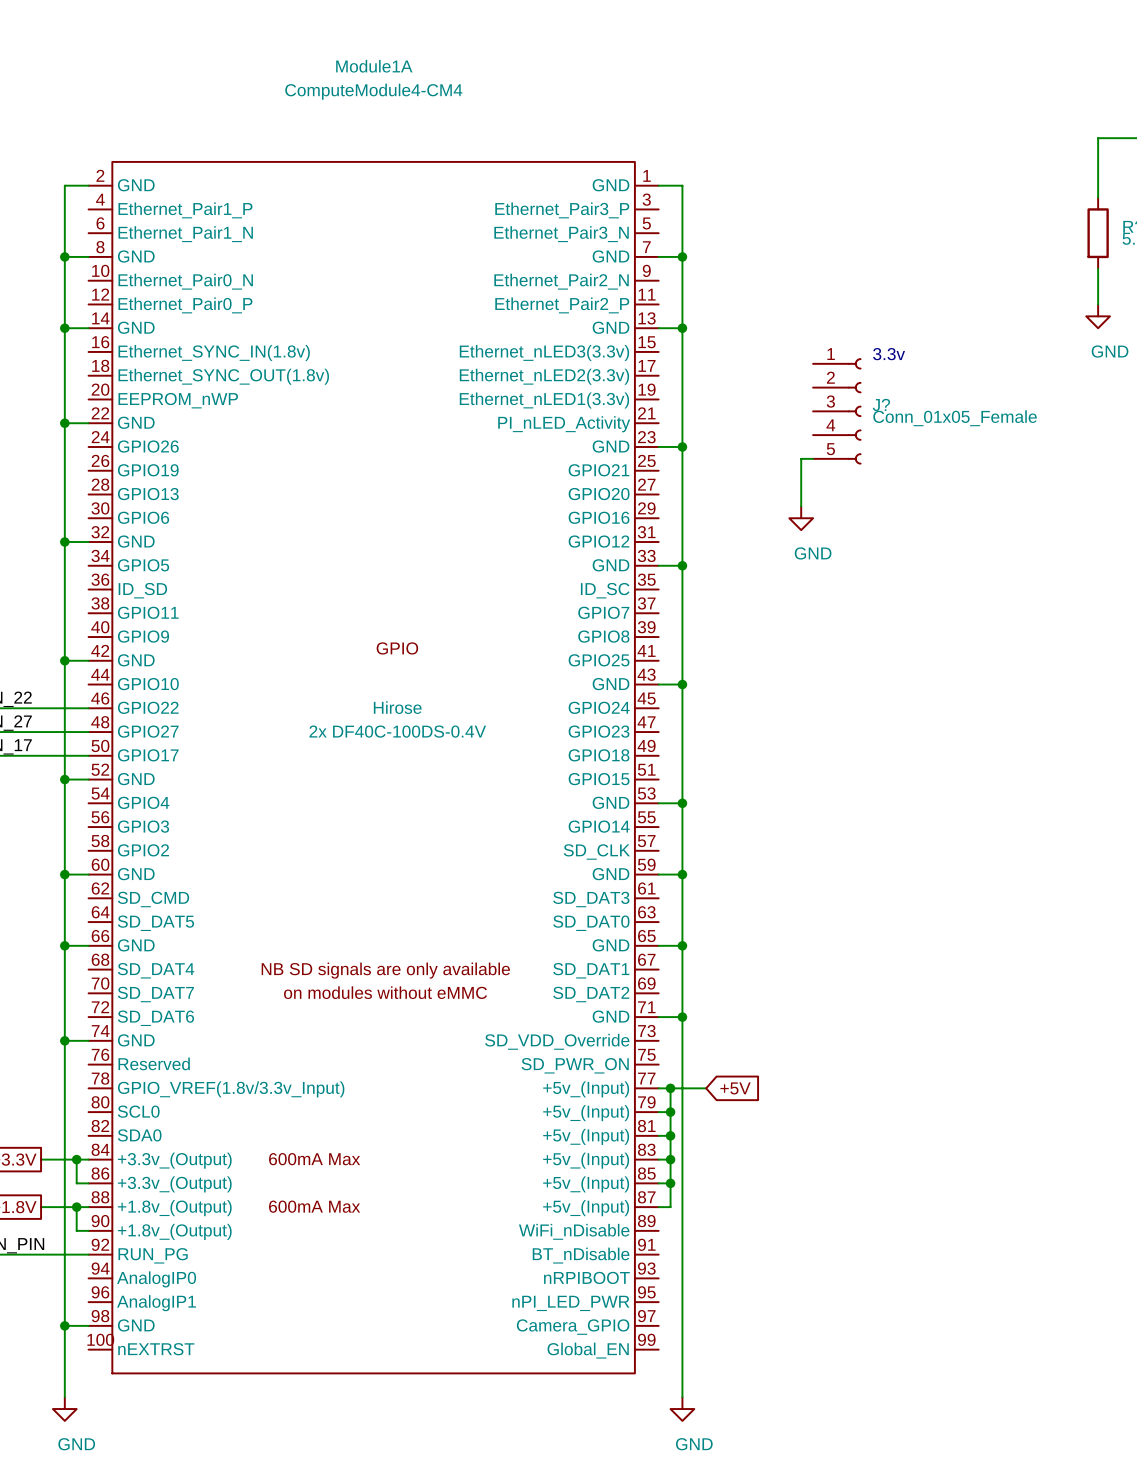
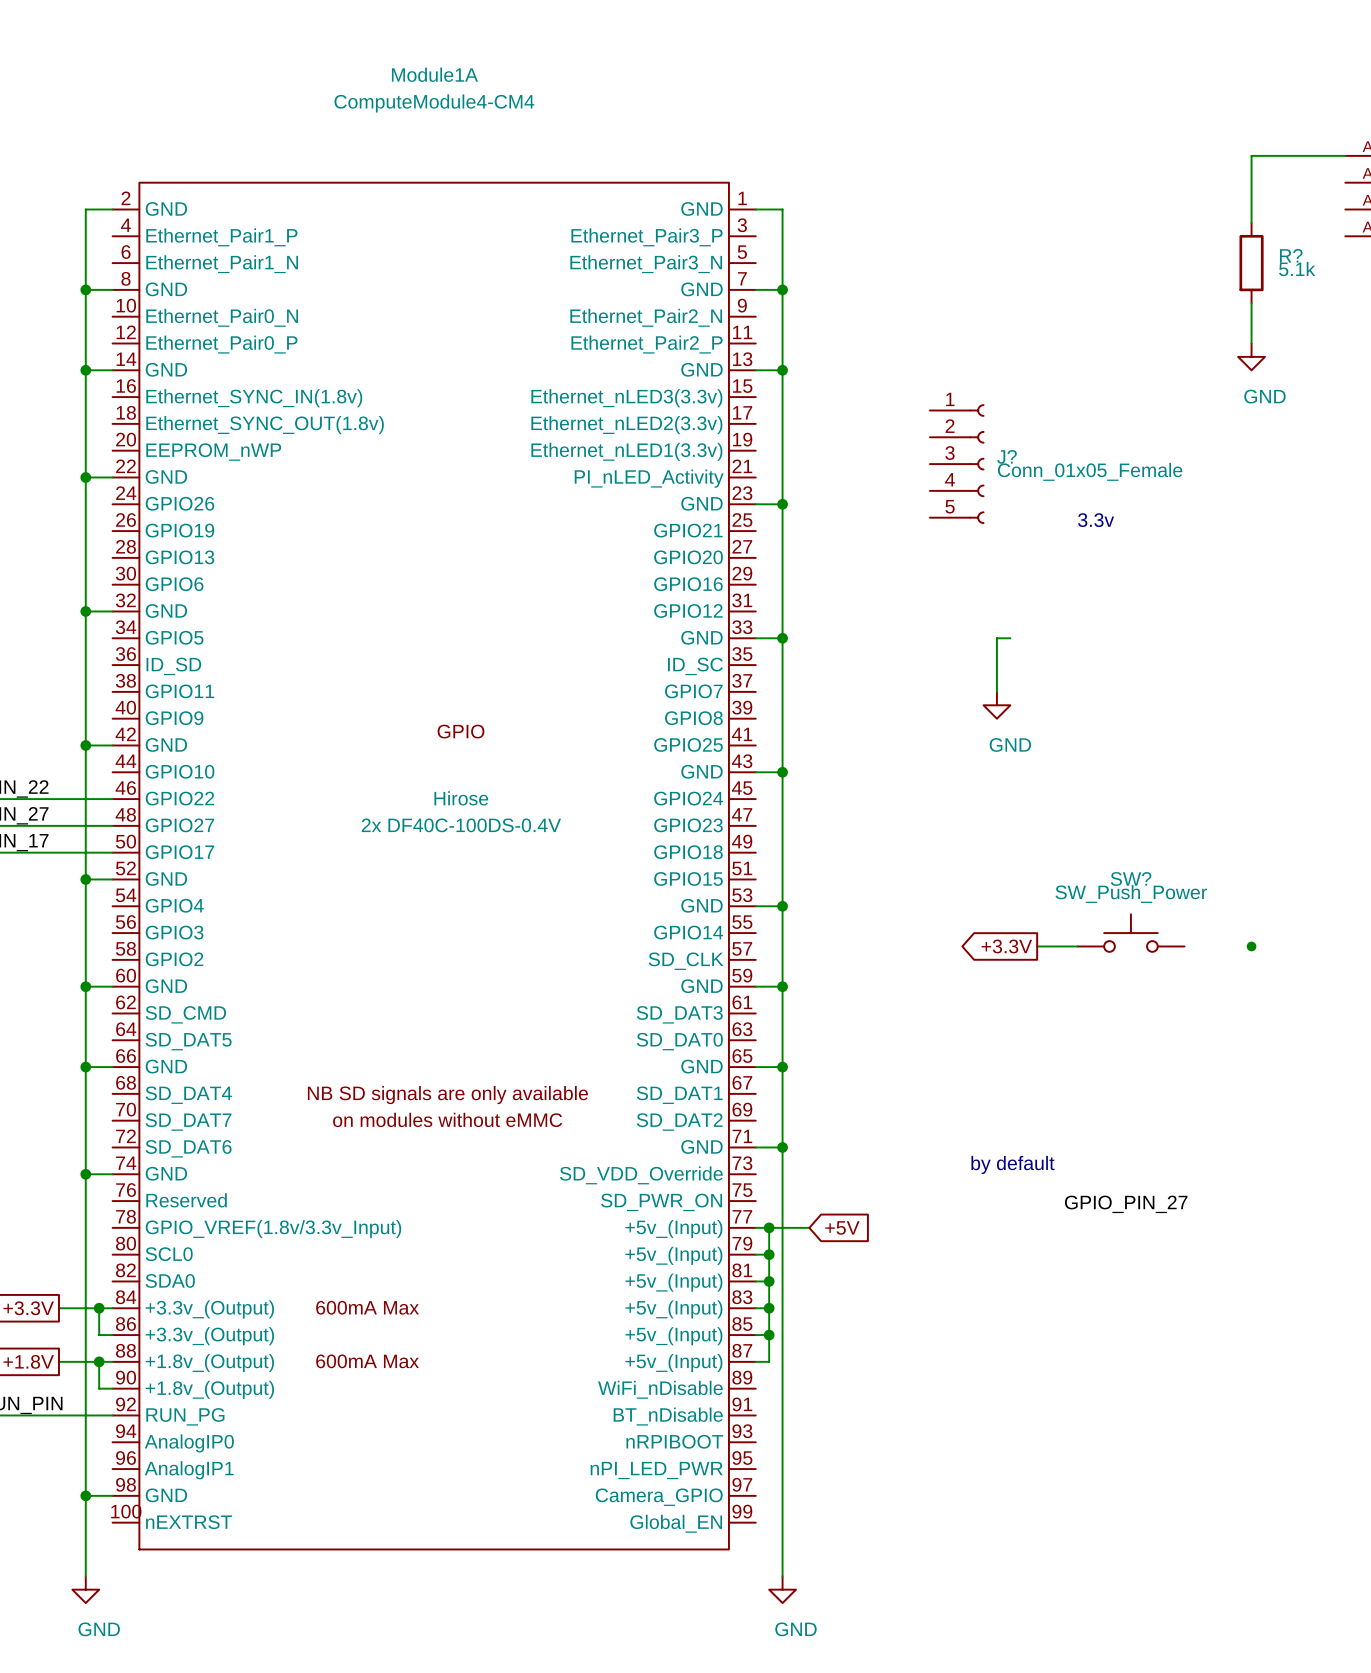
text position: 3.3v (889, 354) -> 3.3v (1096, 520)
wire: (813, 458) (801, 458) (801, 506) -> (1010, 638) (996, 638) (996, 691)
power symbol position: GND (801, 518) -> GND (996, 705)
SW?: none -> SW_Push_Power (1130, 933)
global label: none -> +3.3V (1006, 946)
wire: none -> (1037, 946) (1077, 946)
junction: none -> (1251, 946)
text: none -> by default (1012, 1164)
label: none -> GPIO_PIN_27 (1126, 1204)

